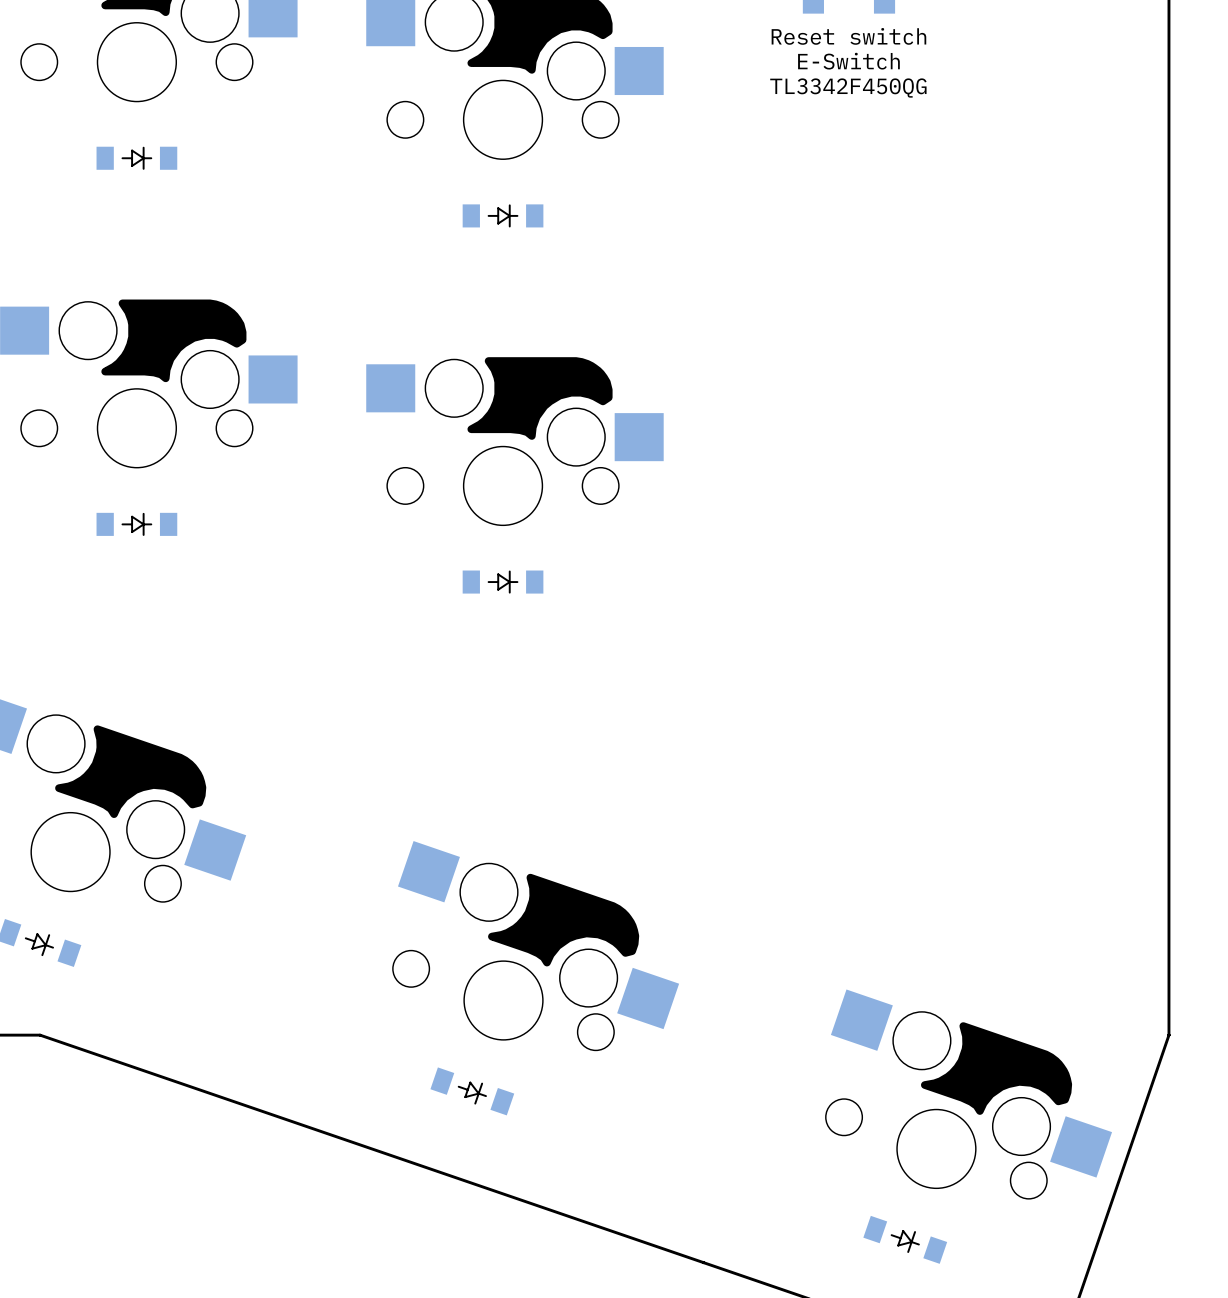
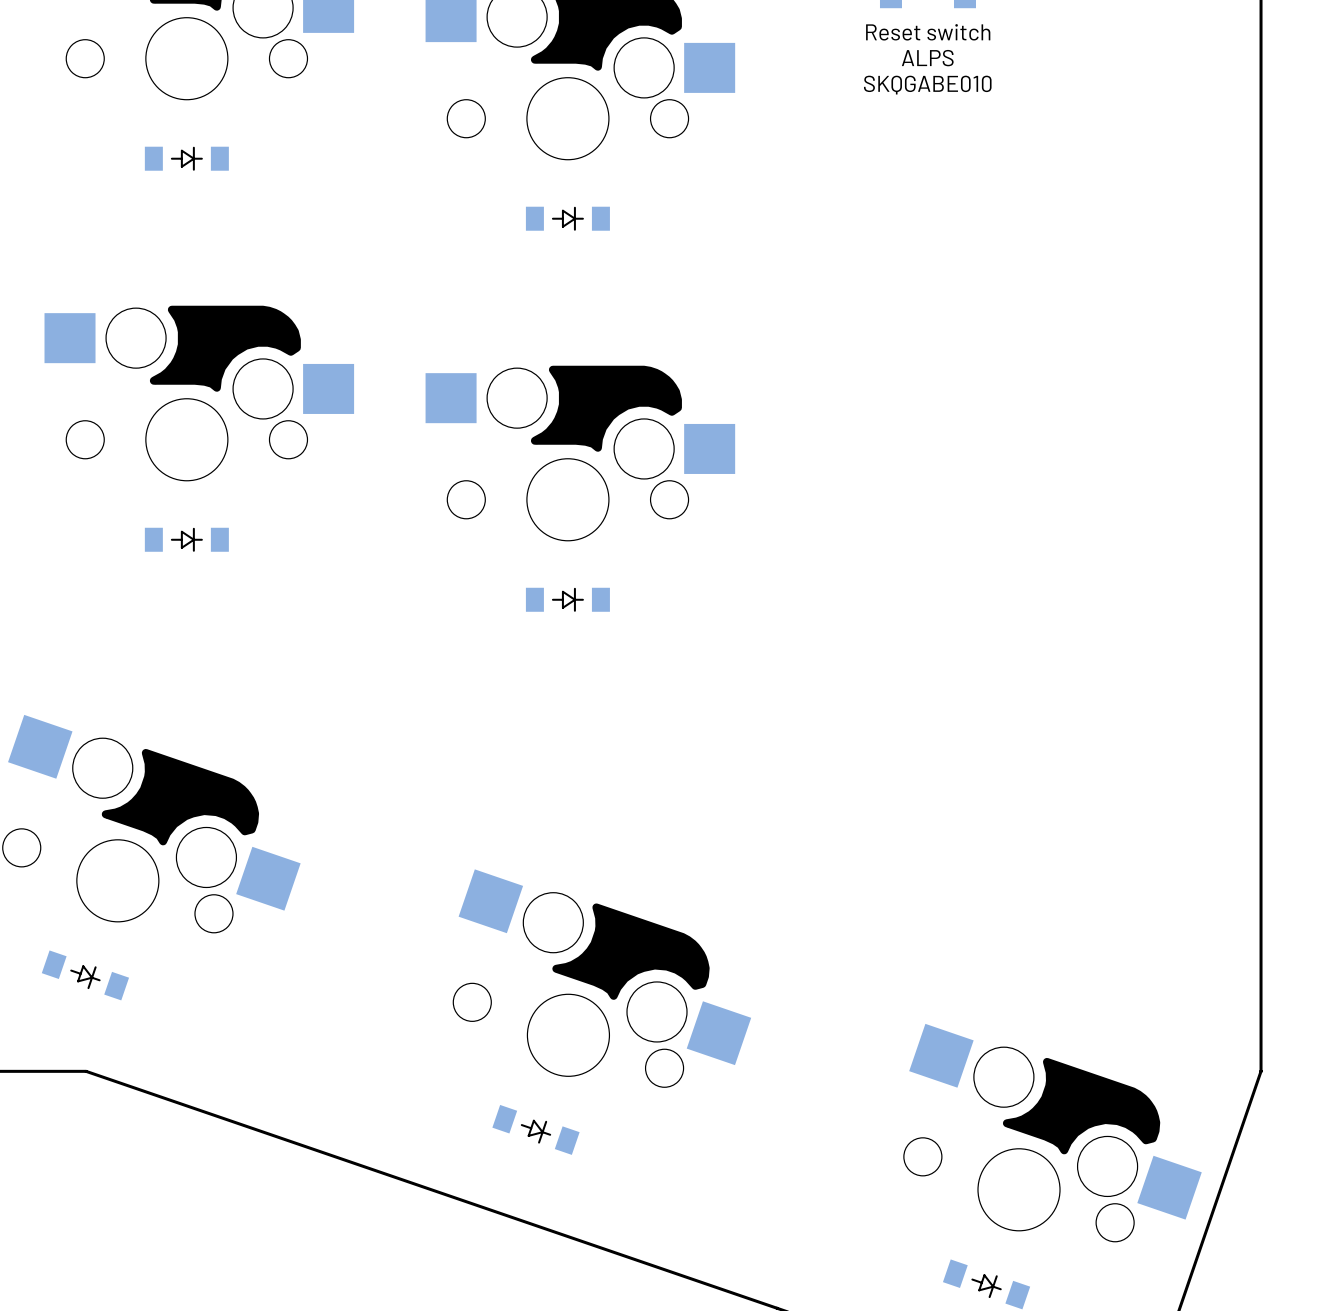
text: E-Switch (848, 61) -> ALPS (927, 58)
text: TL3342F450QG (848, 88) -> SKQGABE010 (927, 85)

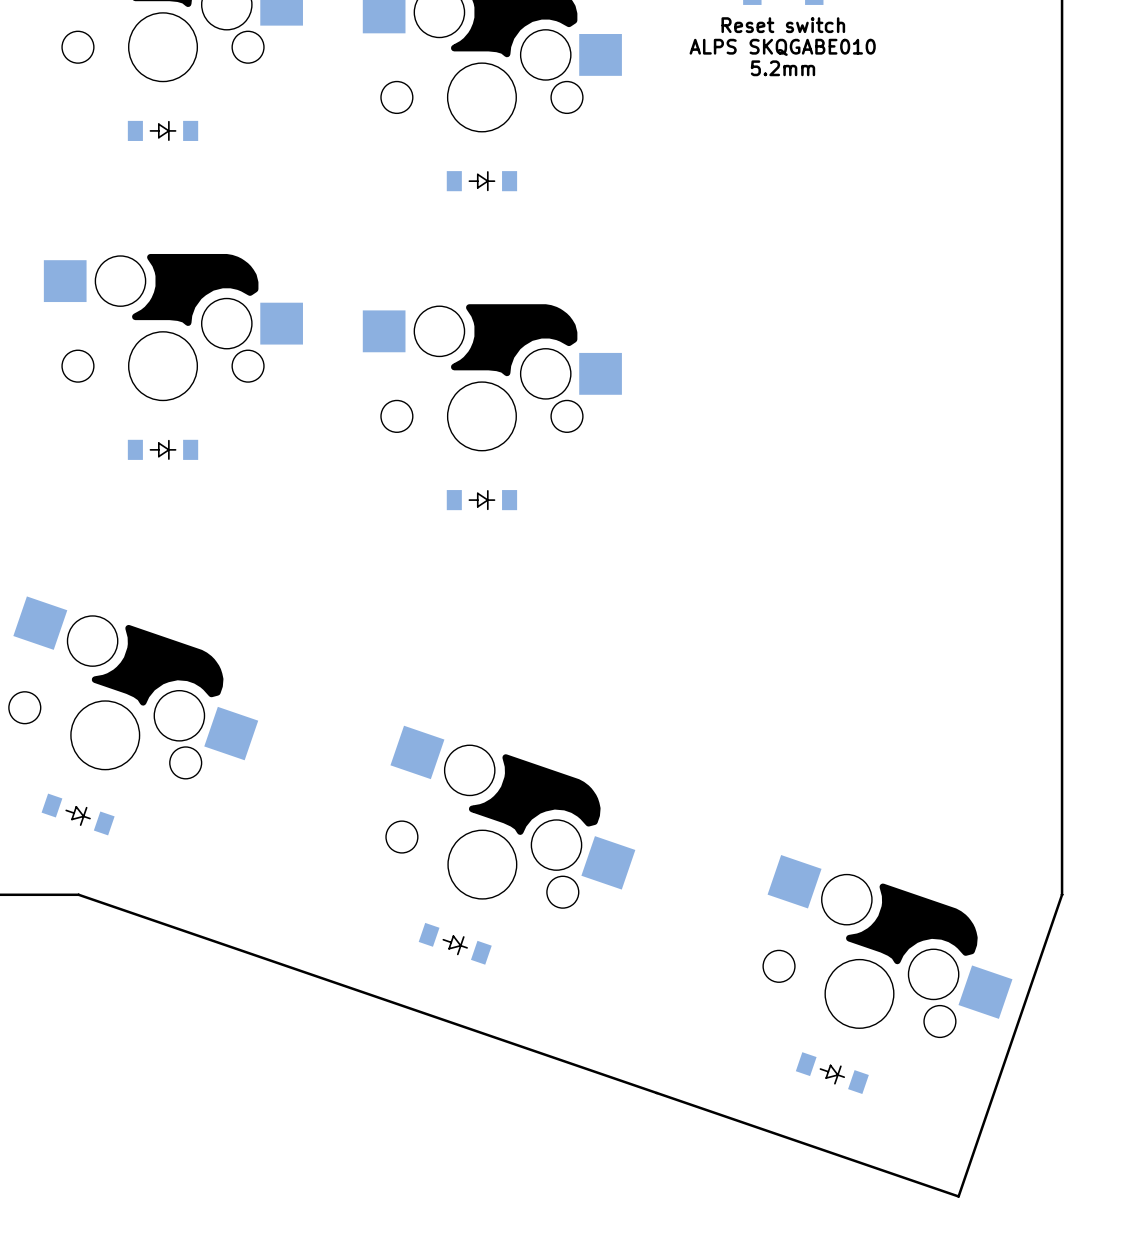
text: ALPS (927, 58) -> ALPS SKQGABE010 (782, 47)
text: SKQGABE010 (927, 85) -> 5.2mm (782, 68)

